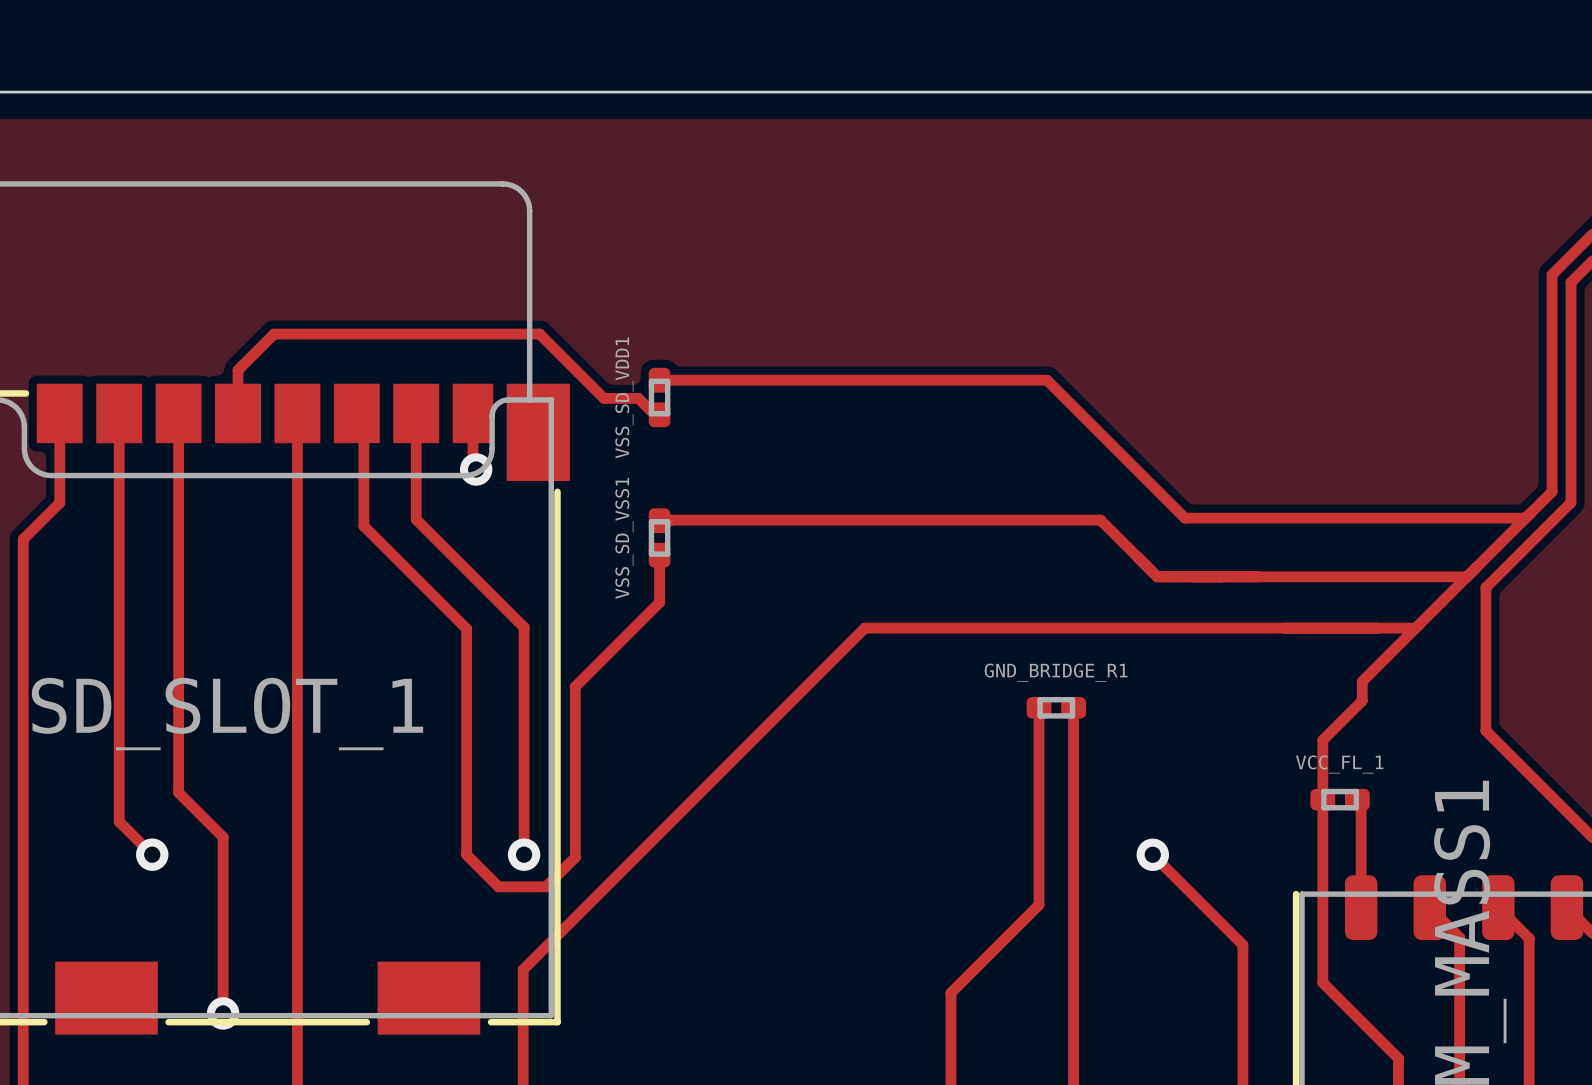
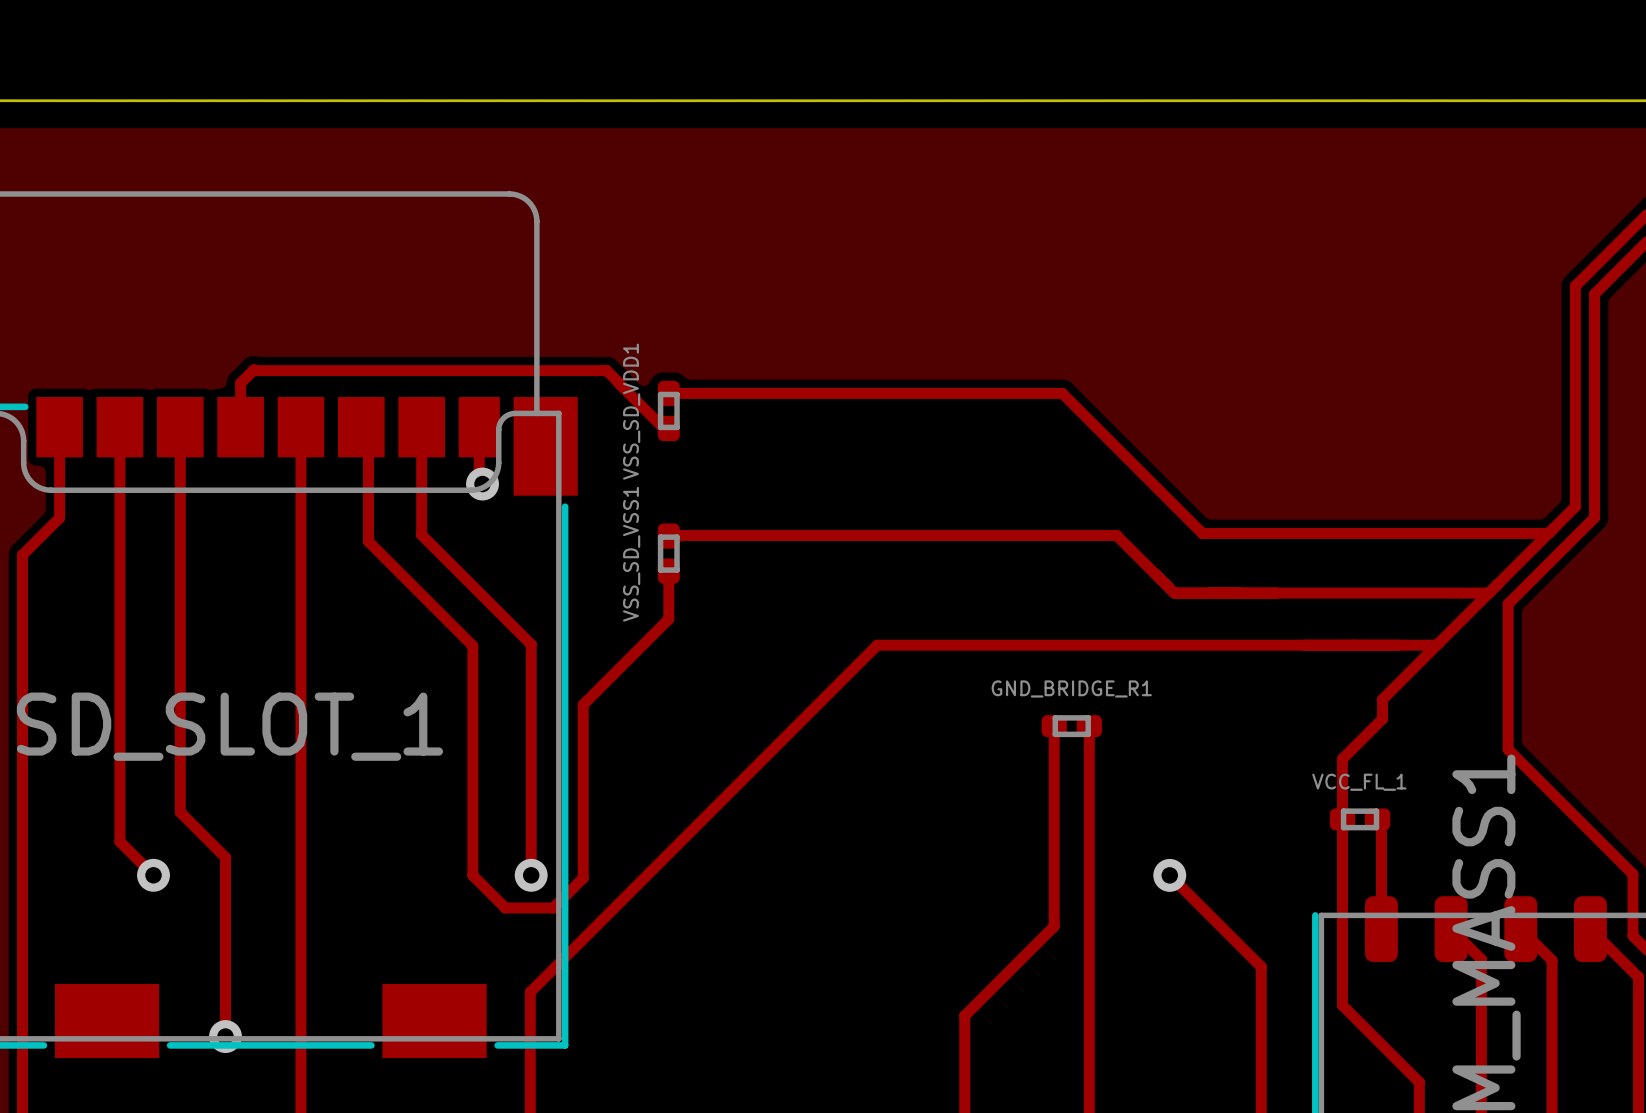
track: (251, 357) (274, 334) (539, 334) (604, 398) (638, 398) -> (254, 370) (606, 370) (618, 382)
track: none -> (618, 383) (647, 411)

